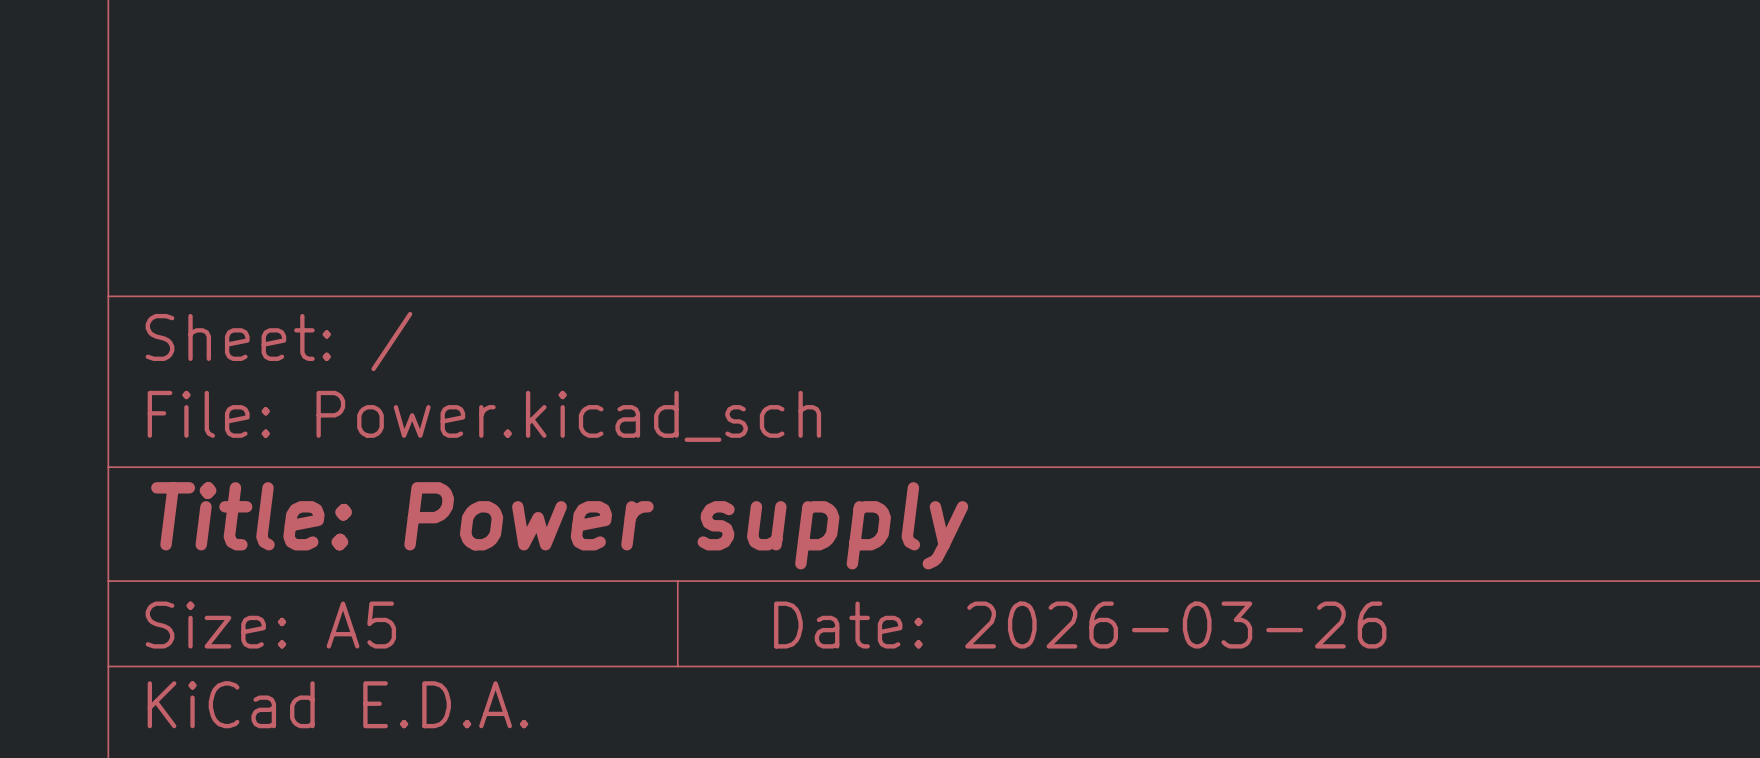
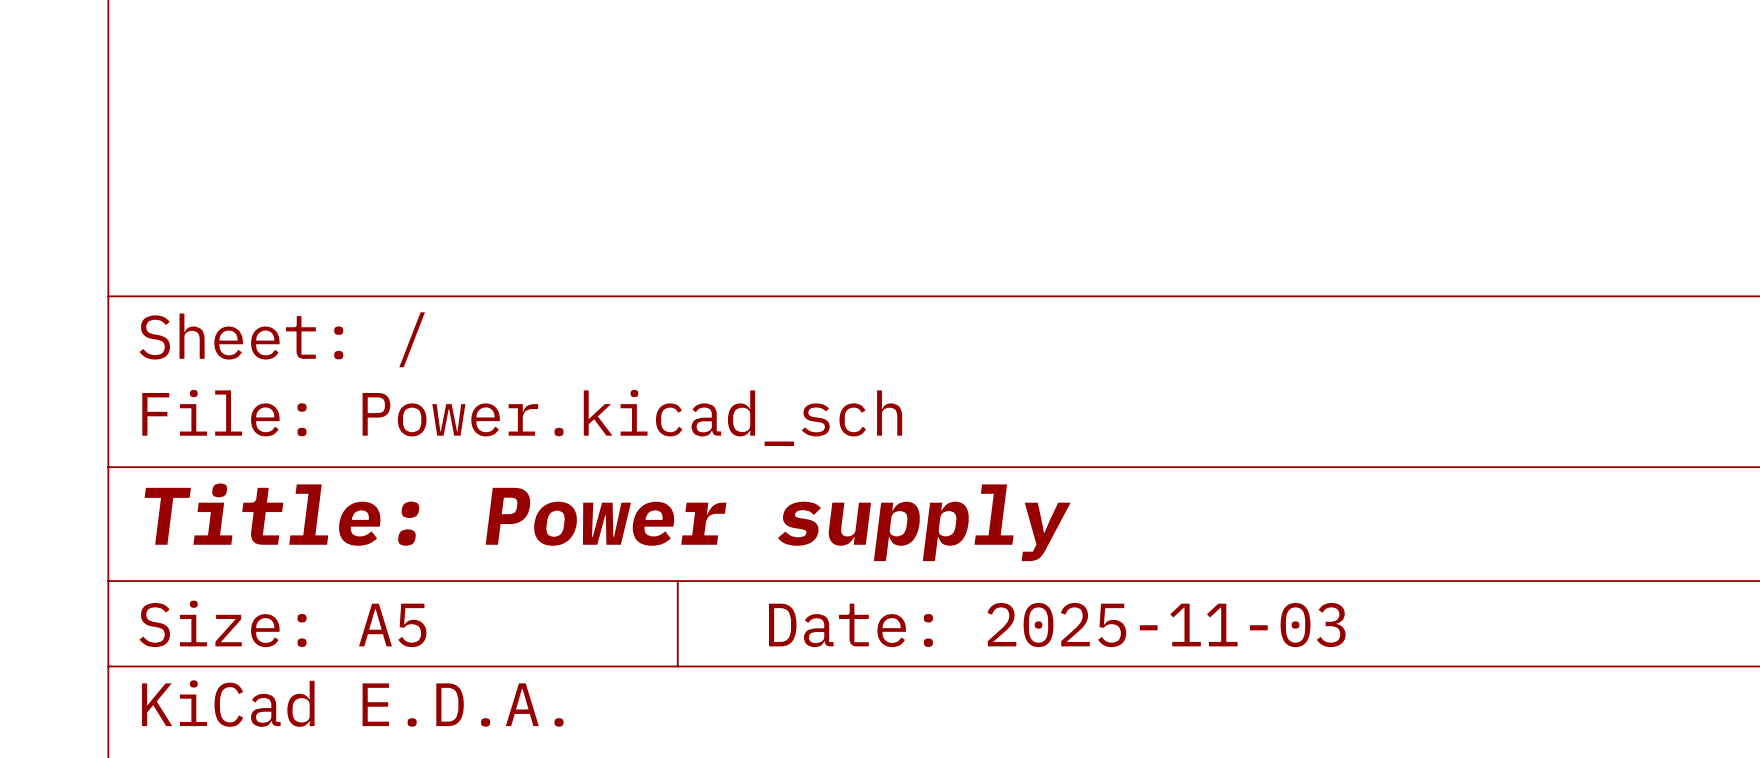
title block: Date: 2026-03-26 (1080, 625) -> Date: 2025-11-03 (1057, 625)

